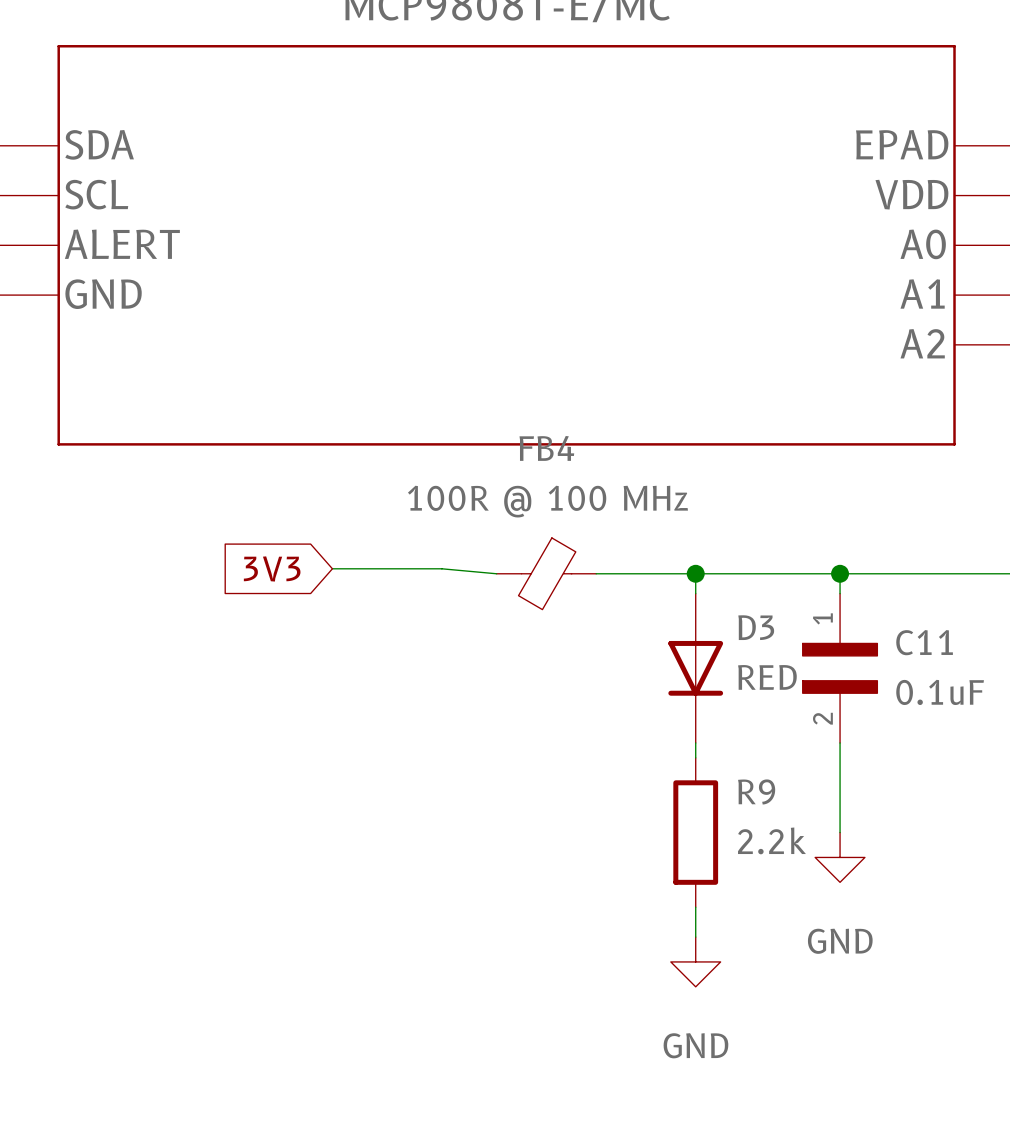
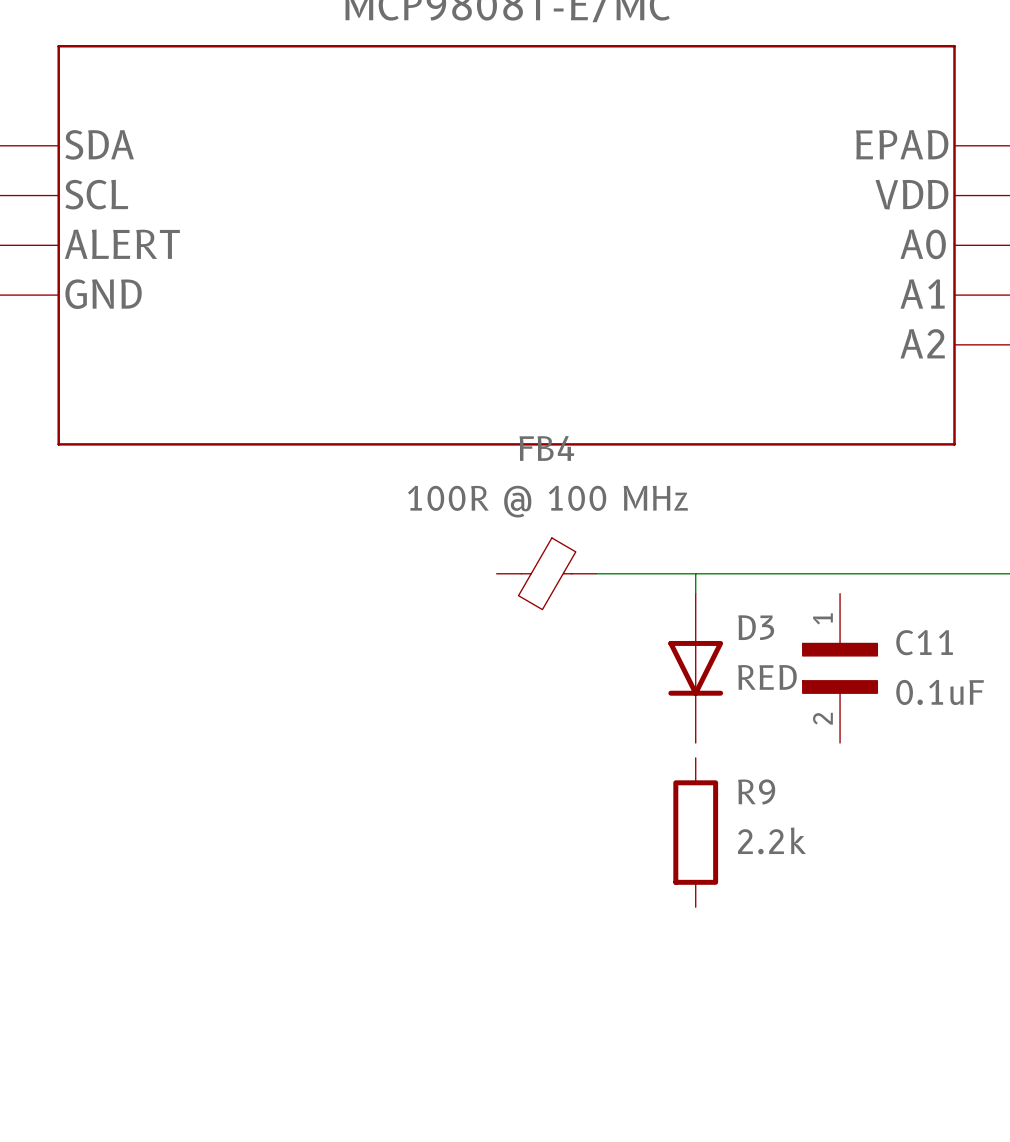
global label: 3V3 (272, 568) -> none
wire: (332, 568) (441, 568) (496, 573) -> none
junction: (695, 573) -> none
wire: (840, 573) (840, 593) -> none
junction: (840, 573) -> none
wire: (695, 742) (695, 757) -> none
wire: (840, 742) (840, 832) -> none
power symbol: GND (840, 857) -> none
wire: (695, 907) (695, 937) -> none
power symbol: GND (695, 961) -> none

